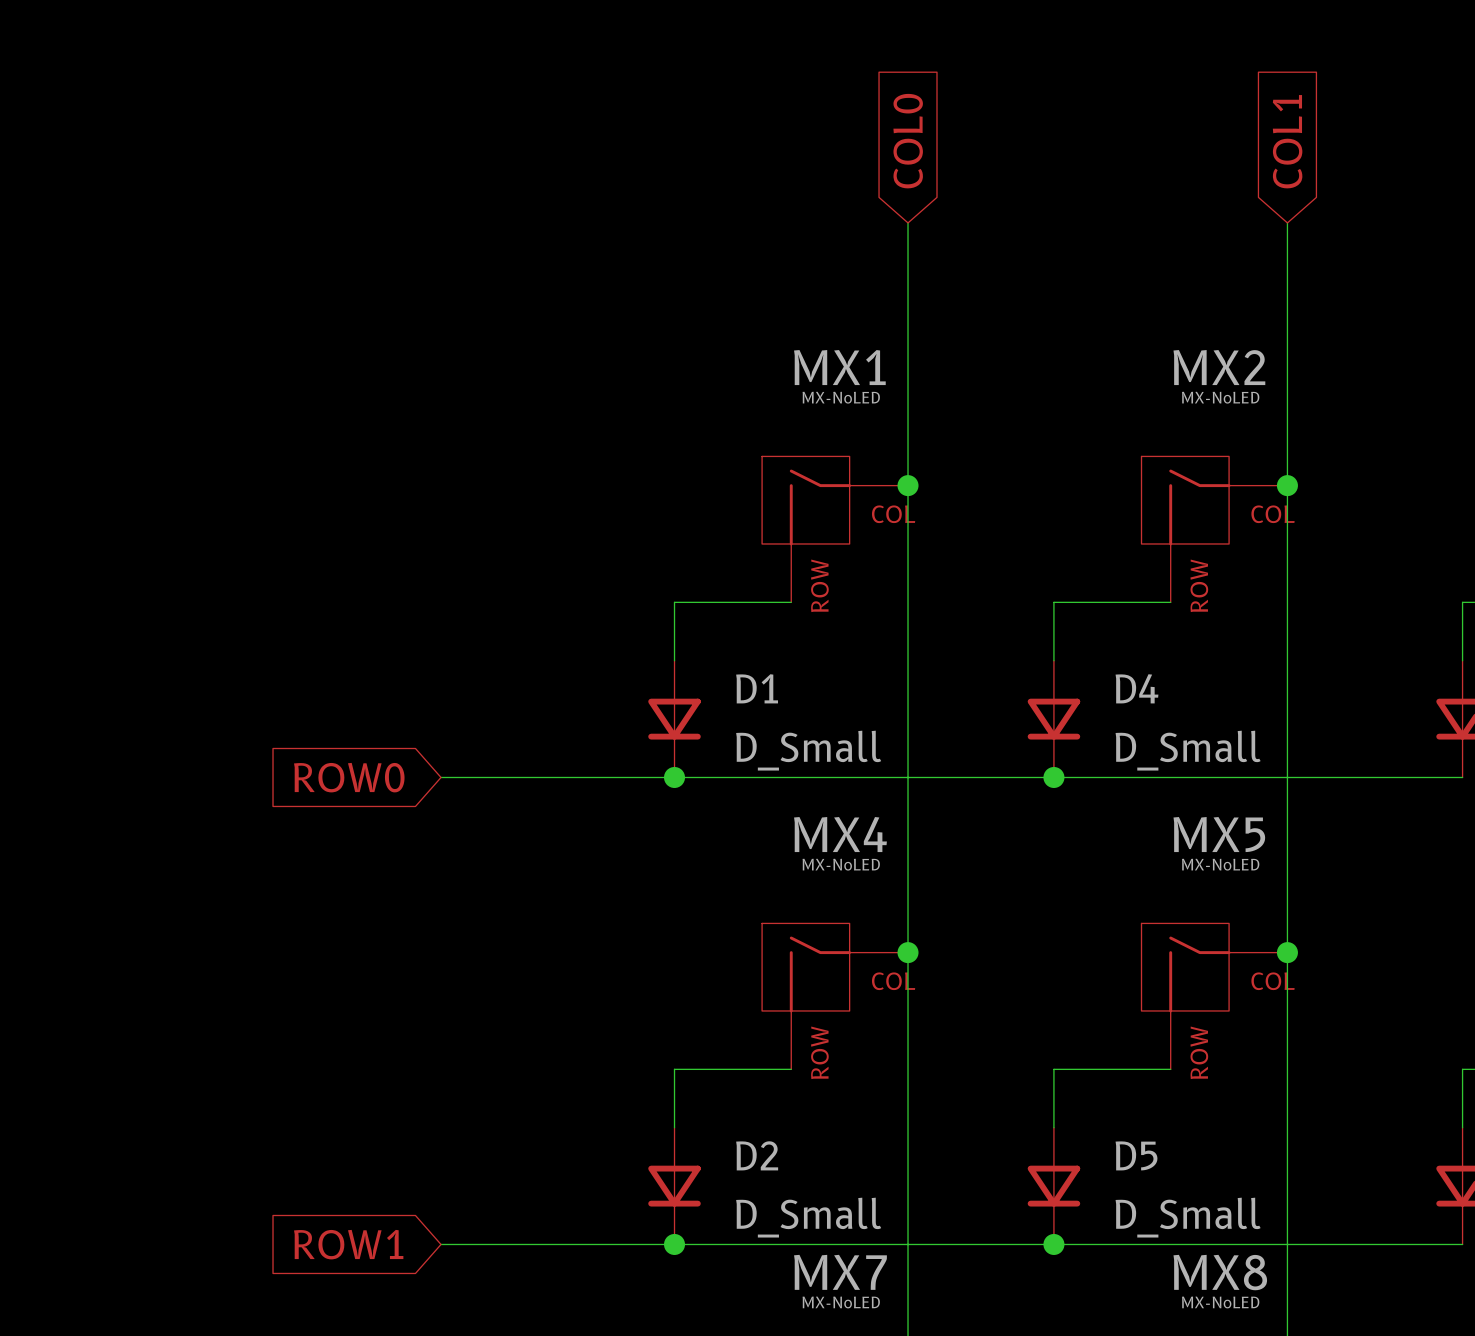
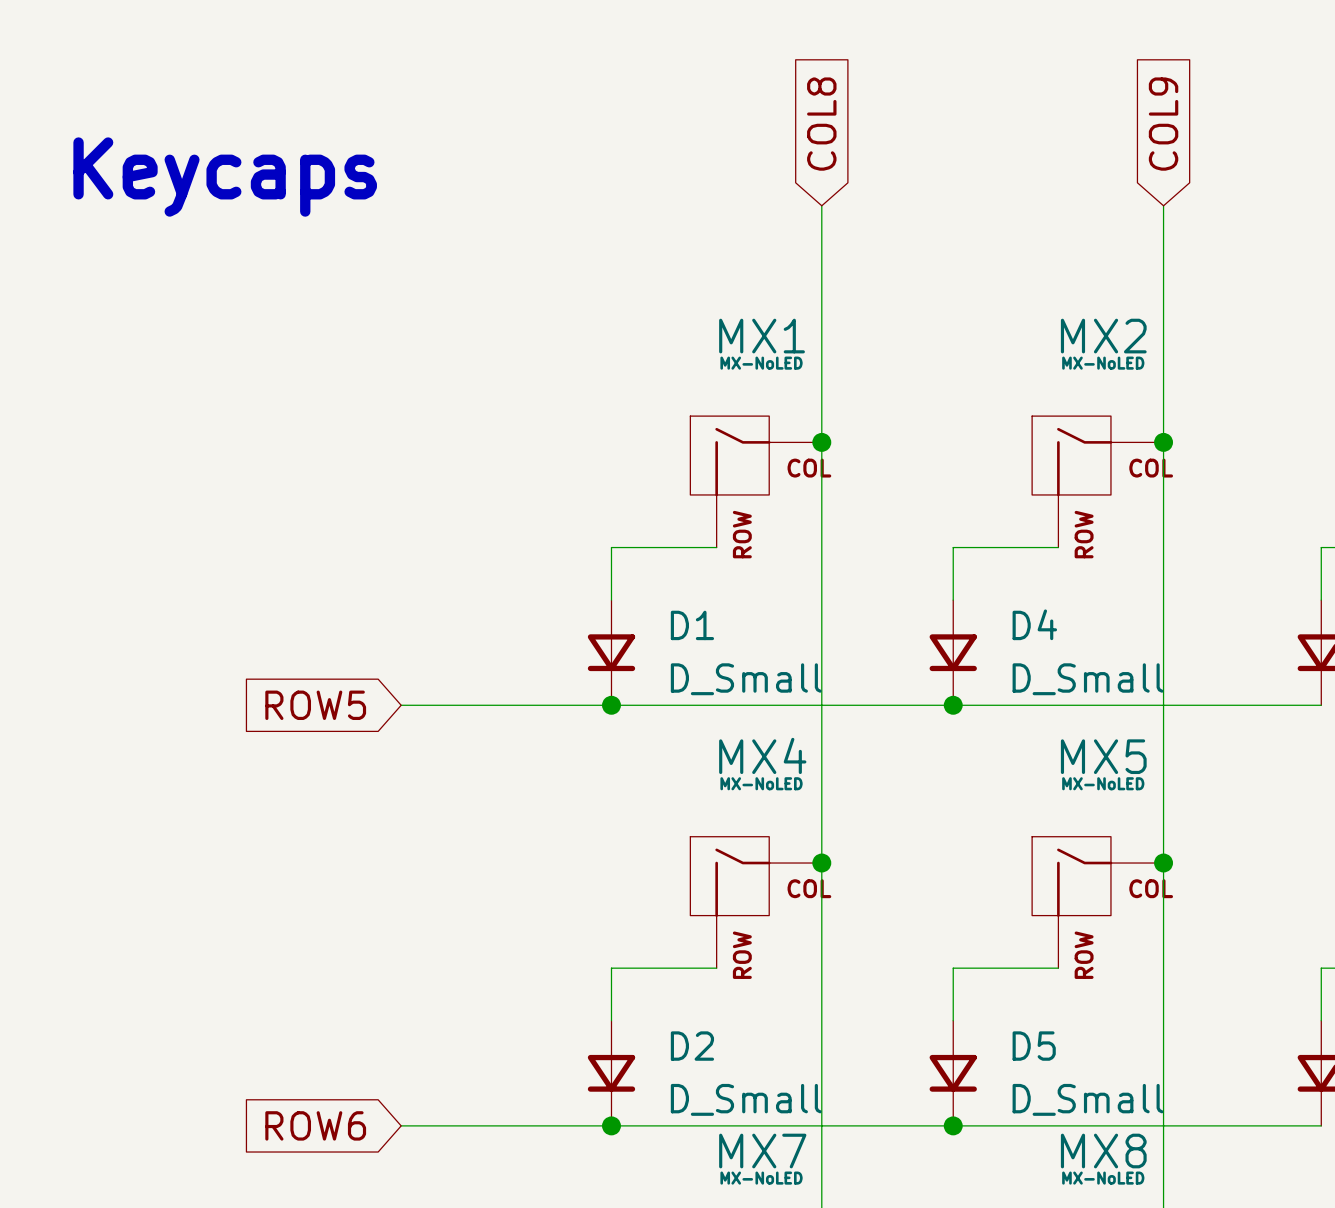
global label: COL0 (908, 141) -> COL8 (821, 124)
global label: COL1 (1287, 141) -> COL9 (1163, 124)
text: none -> Keycaps (225, 177)
global label: ROW0 (349, 777) -> ROW5 (315, 705)
global label: ROW1 (348, 1244) -> ROW6 (315, 1125)

